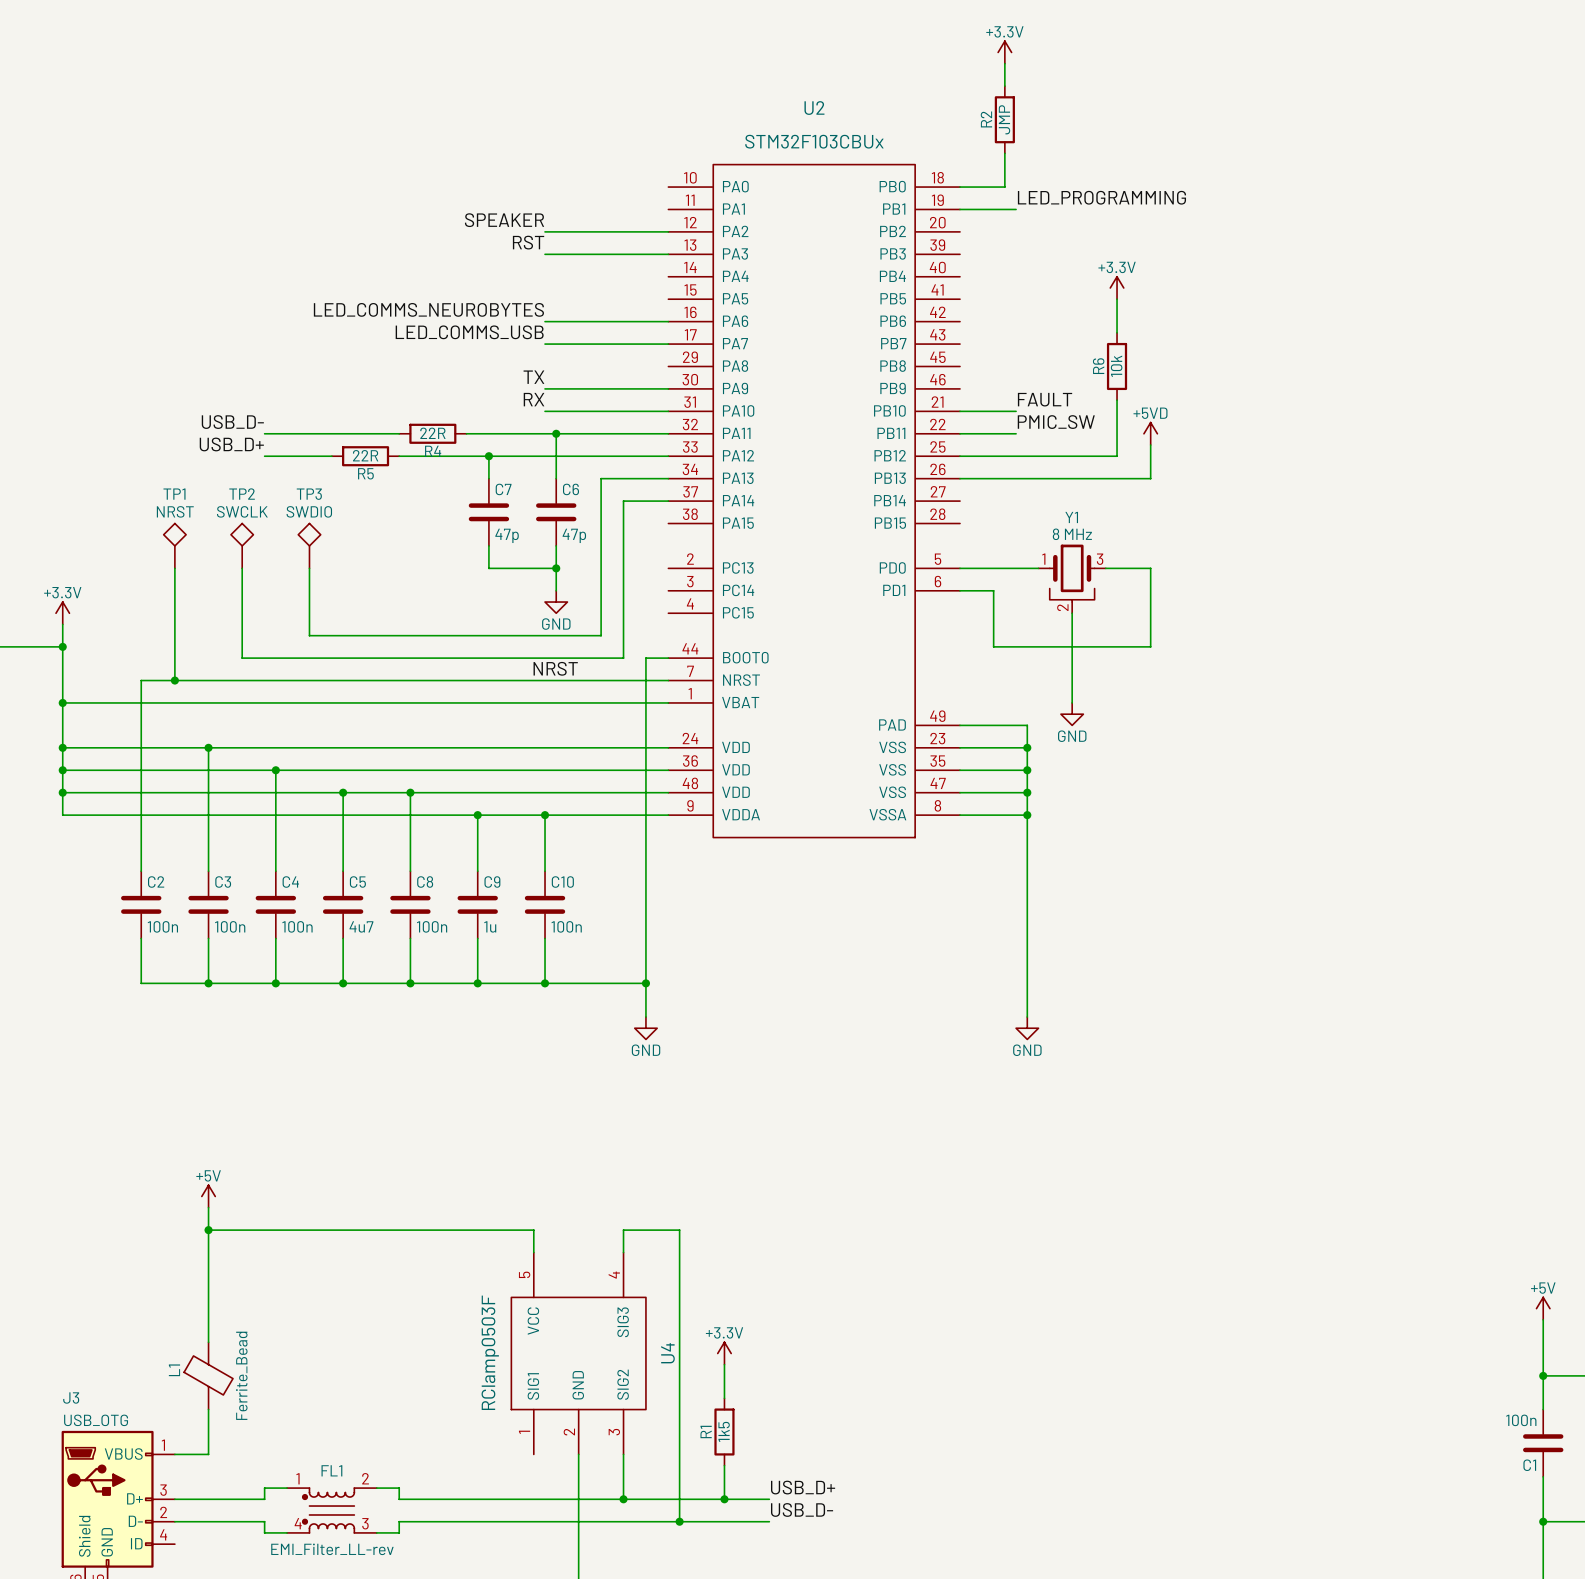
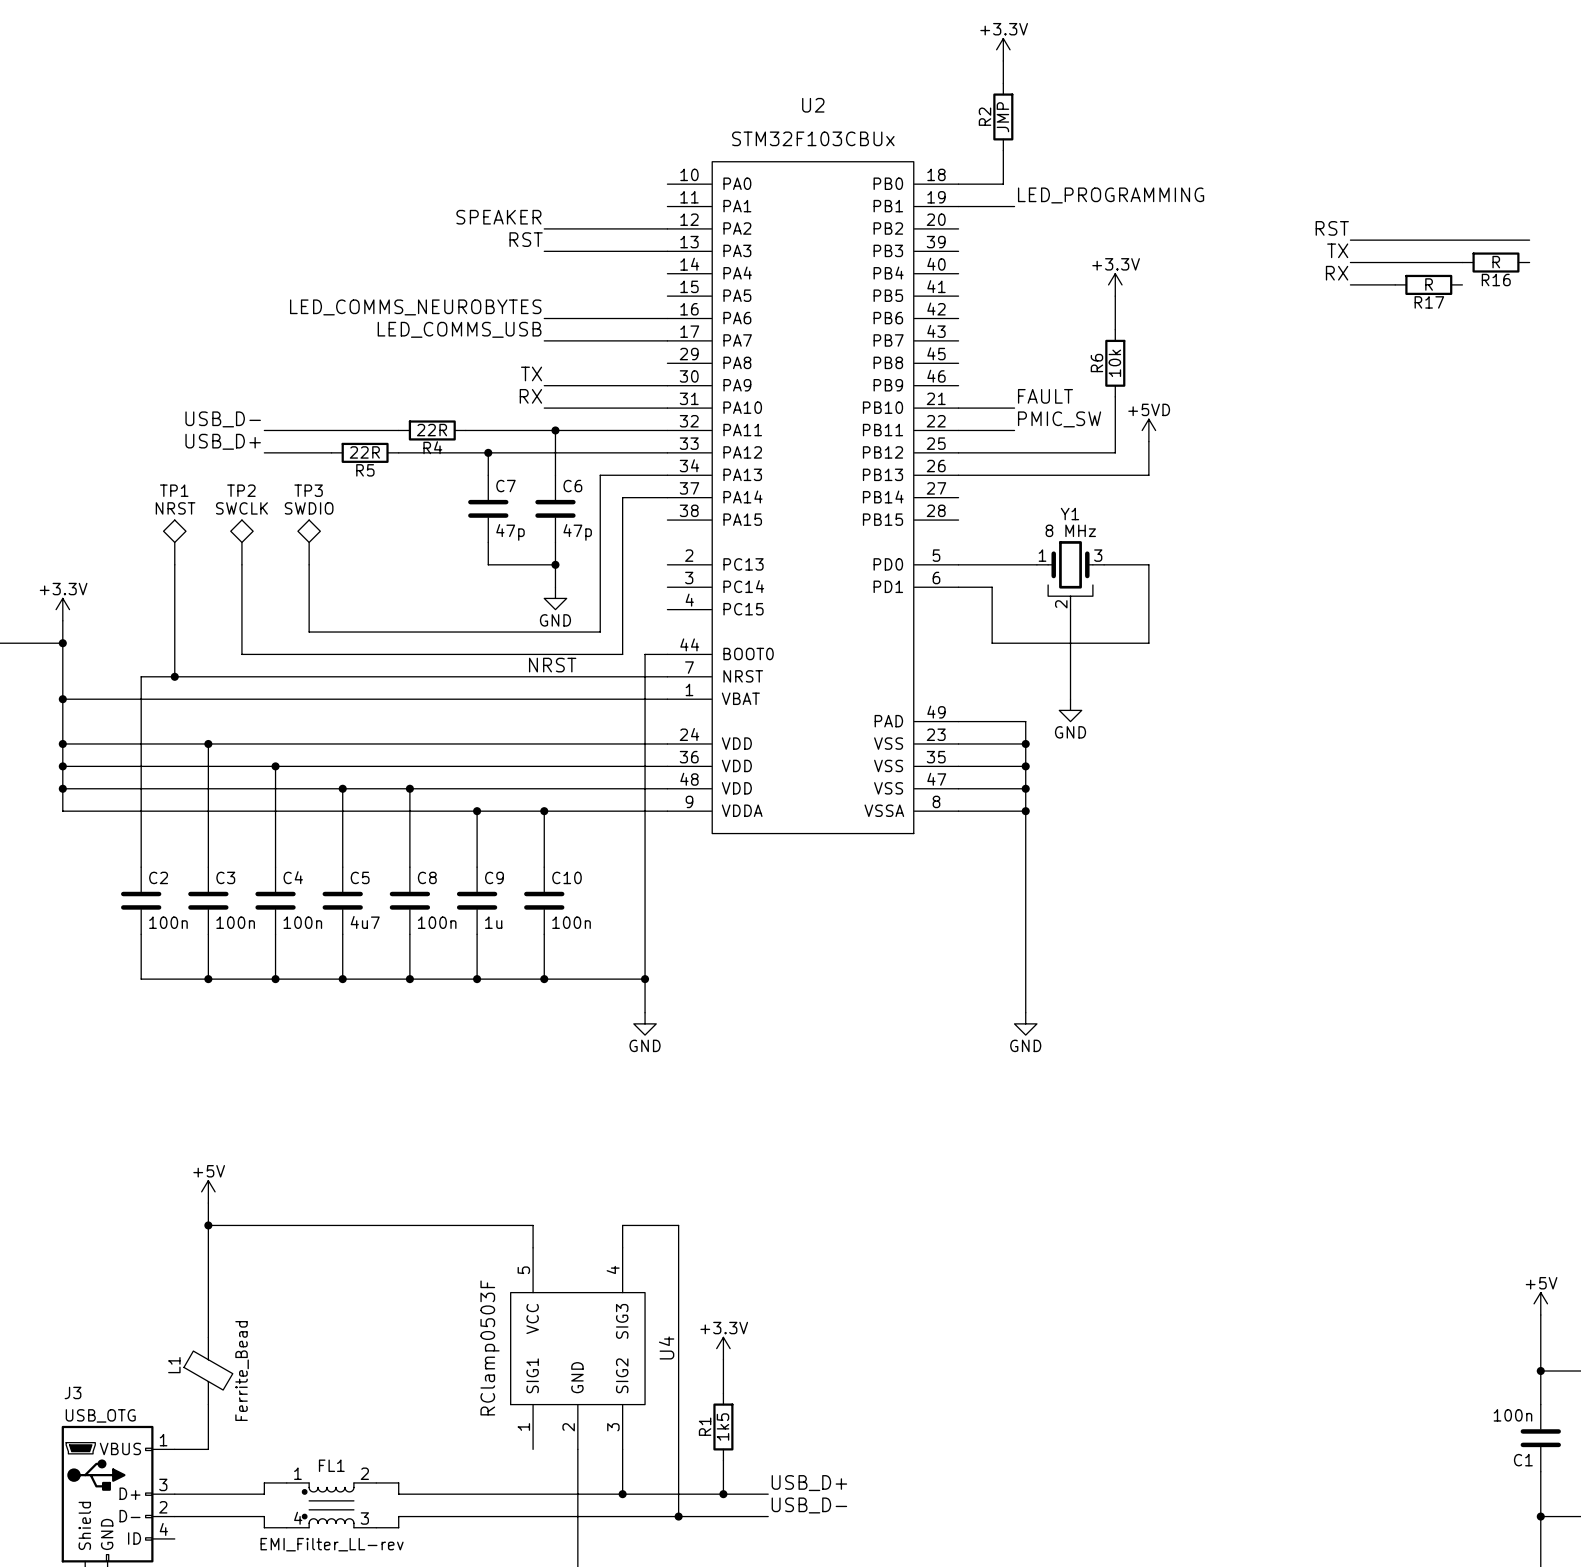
label: none -> RST (1332, 228)
wire: none -> (1350, 240) (1529, 240)
label: none -> TX (1337, 250)
wire: none -> (1350, 262) (1462, 262)
R16: none -> R (1495, 262)
label: none -> RX (1337, 273)
wire: none -> (1350, 284) (1395, 284)
R17: none -> R (1428, 284)

